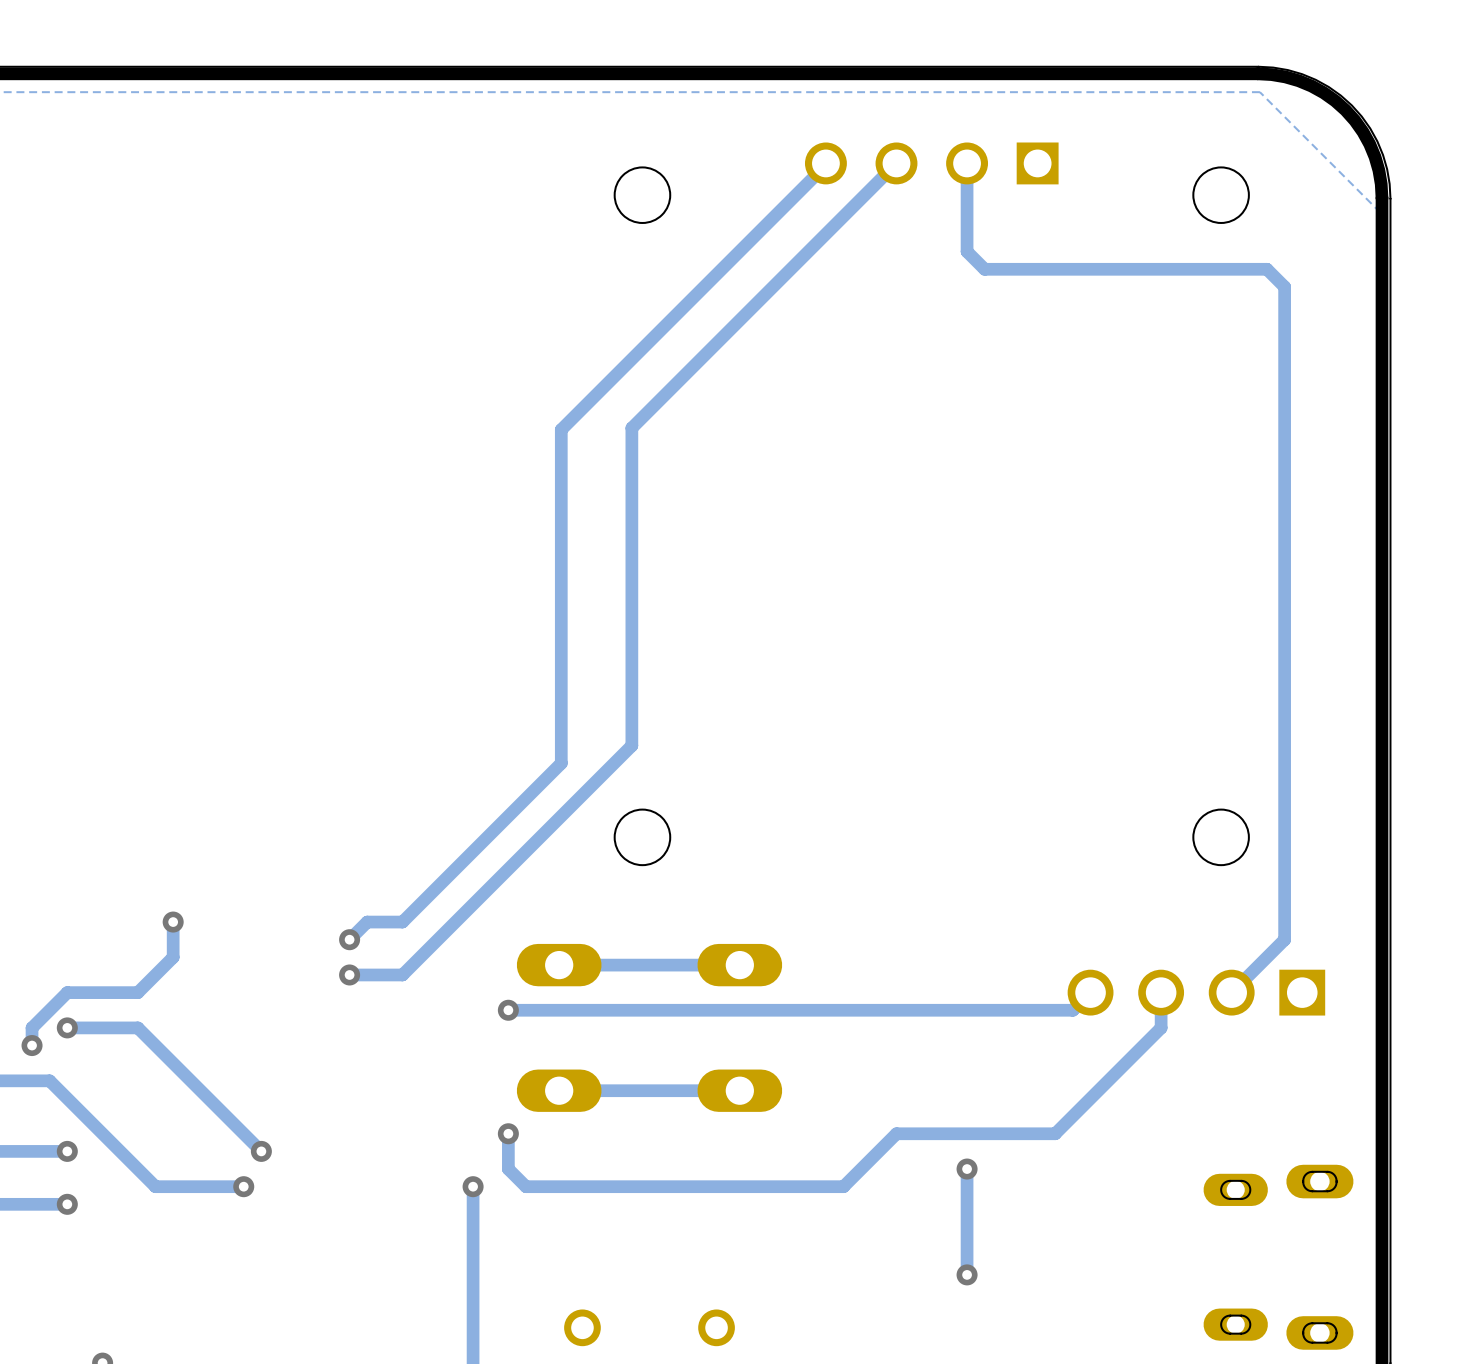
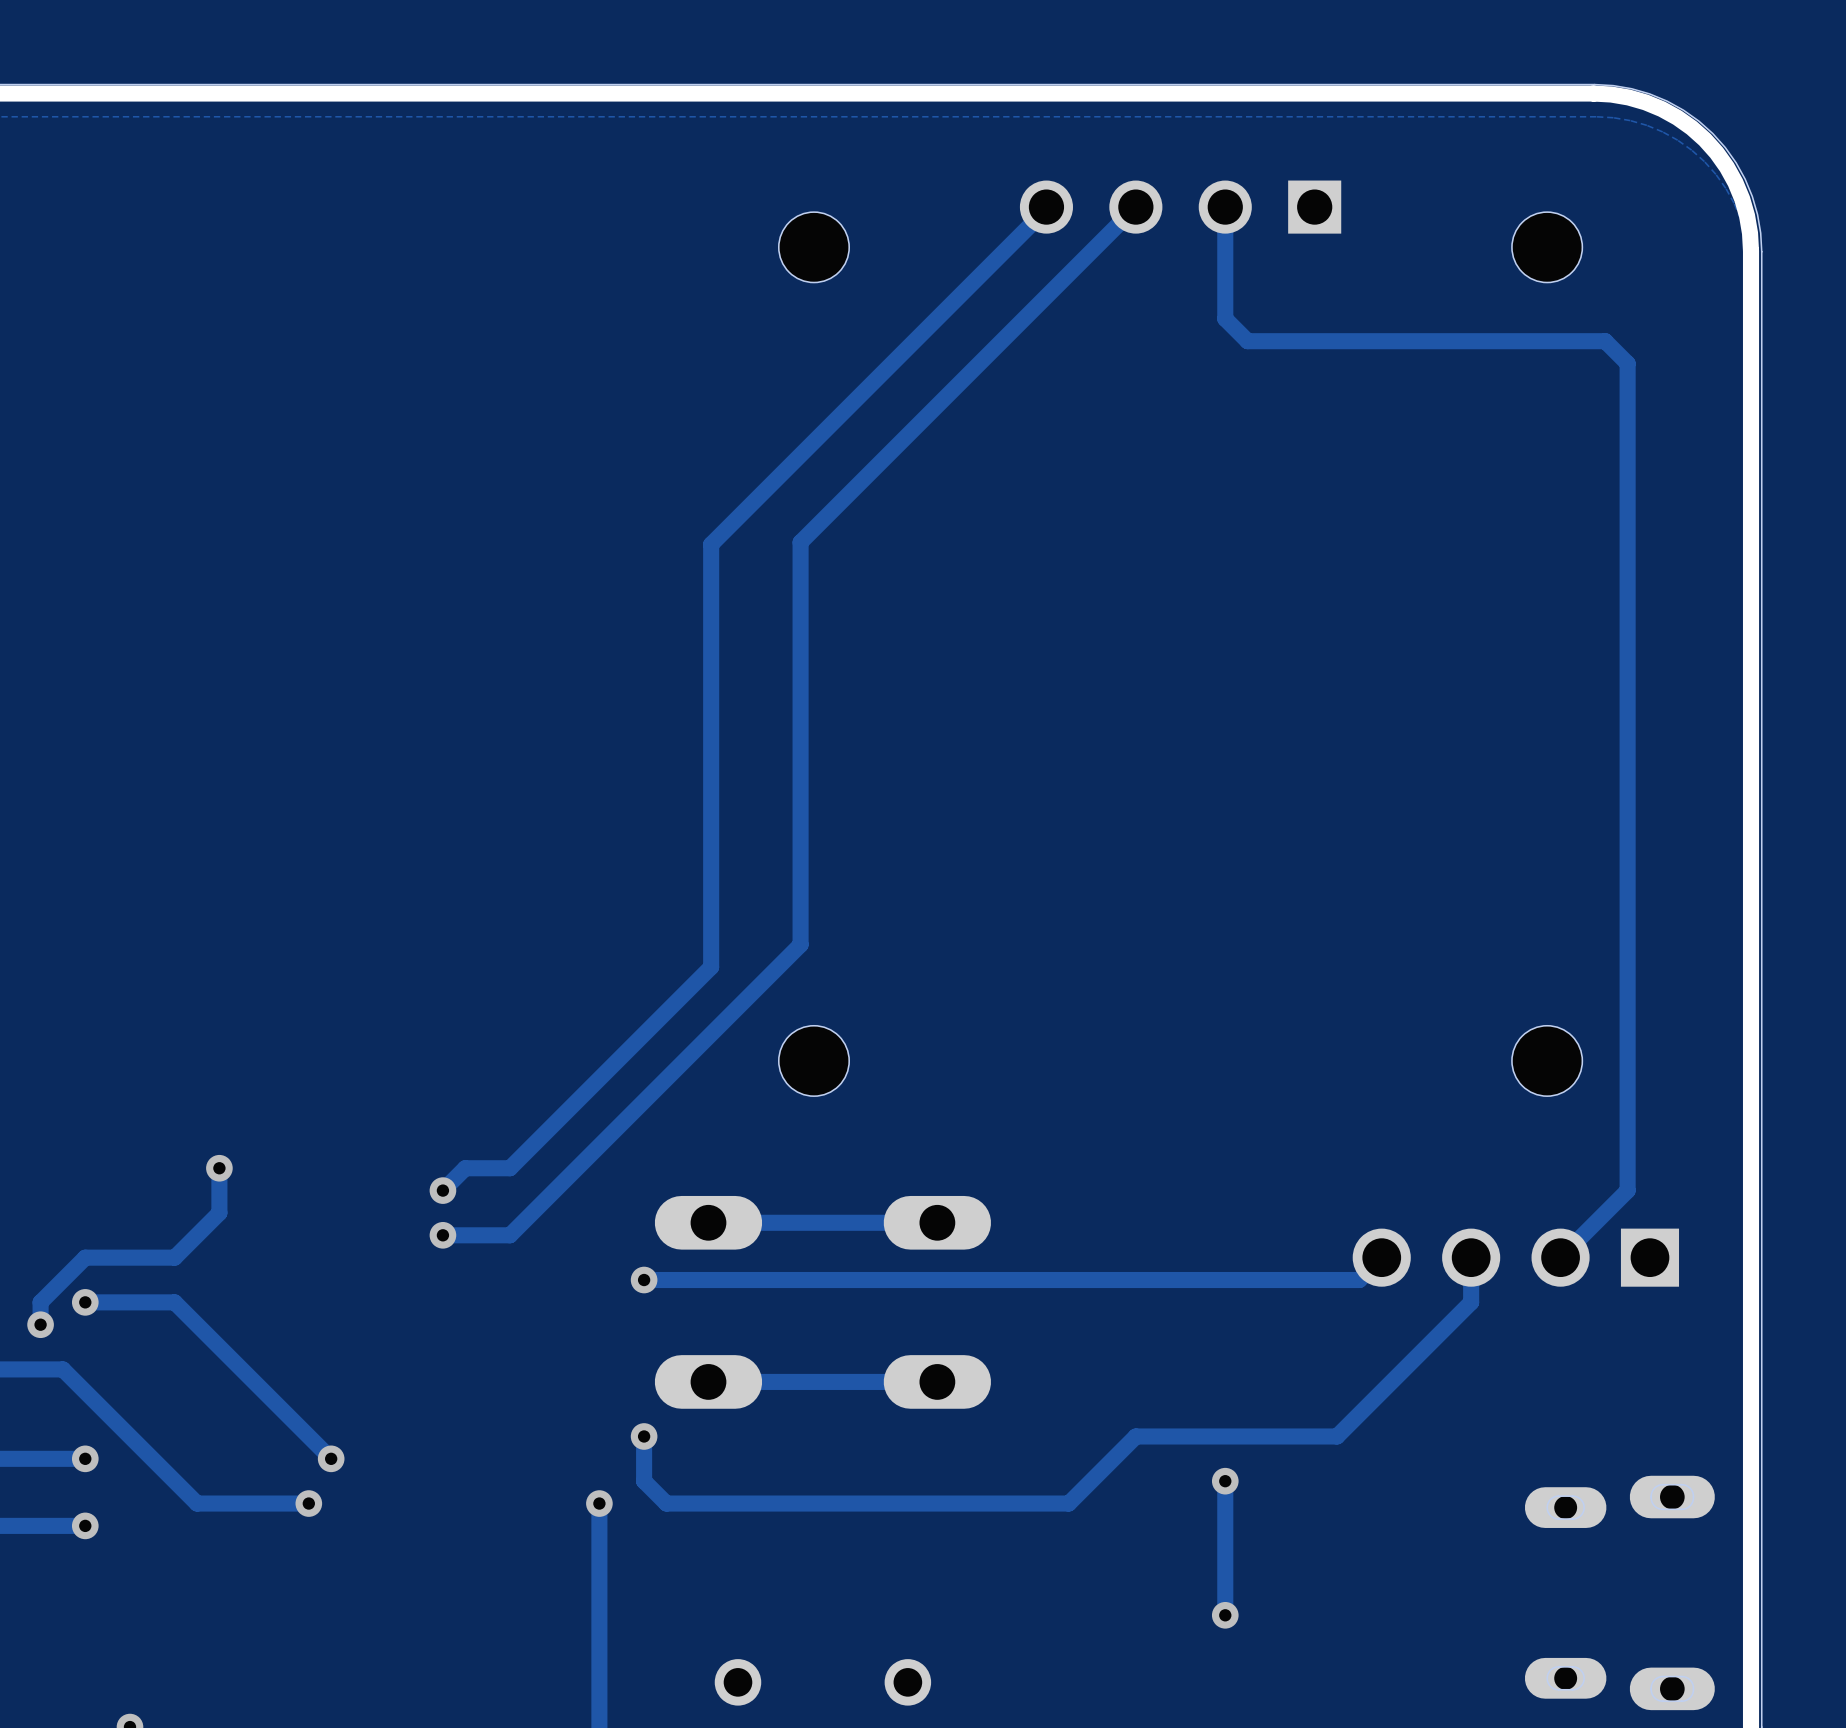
zone outline: (1259, 92) (1380, 212) -> (1596, 116) (1630, 120) (1646, 125) (1677, 140) (1704, 161) (1725, 188) (1734, 203) (1745, 235) (1749, 269)

